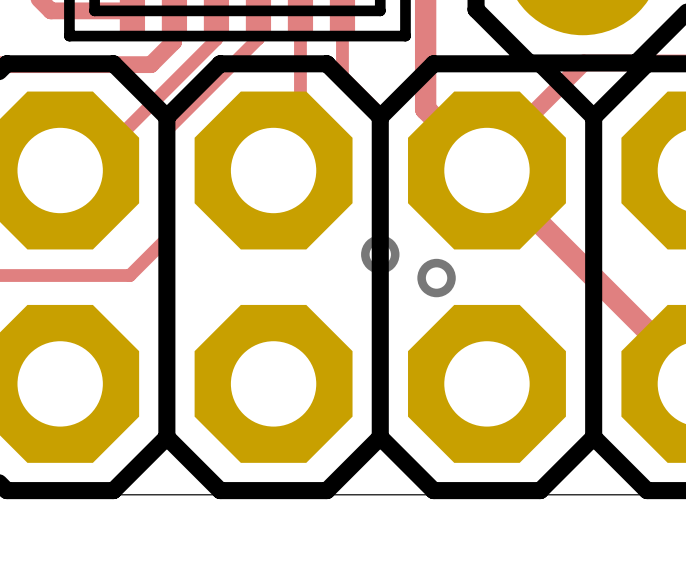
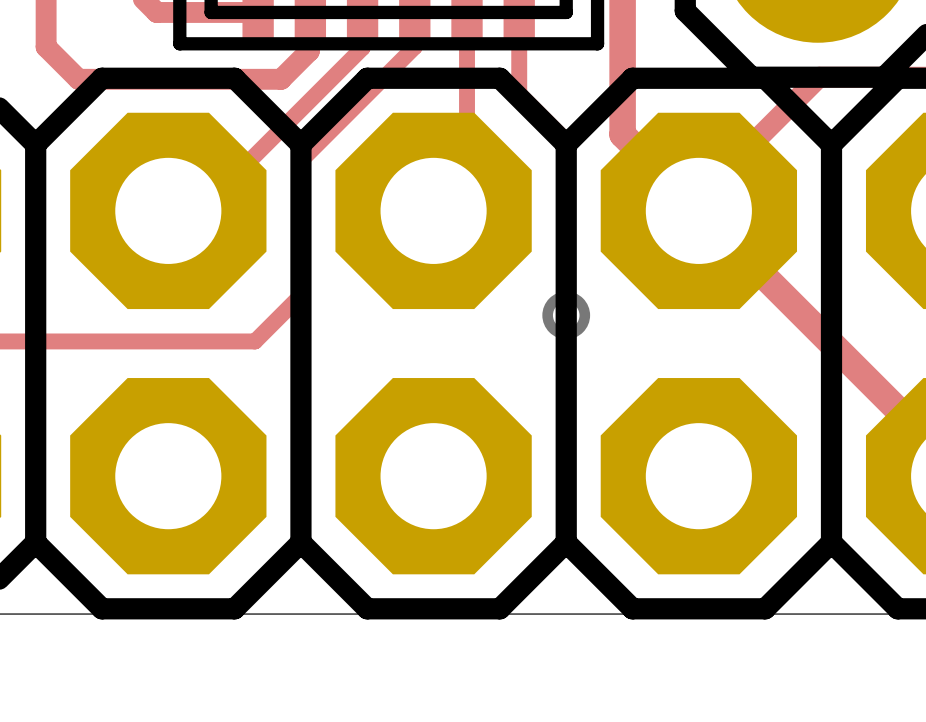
via: (436, 278) -> none

